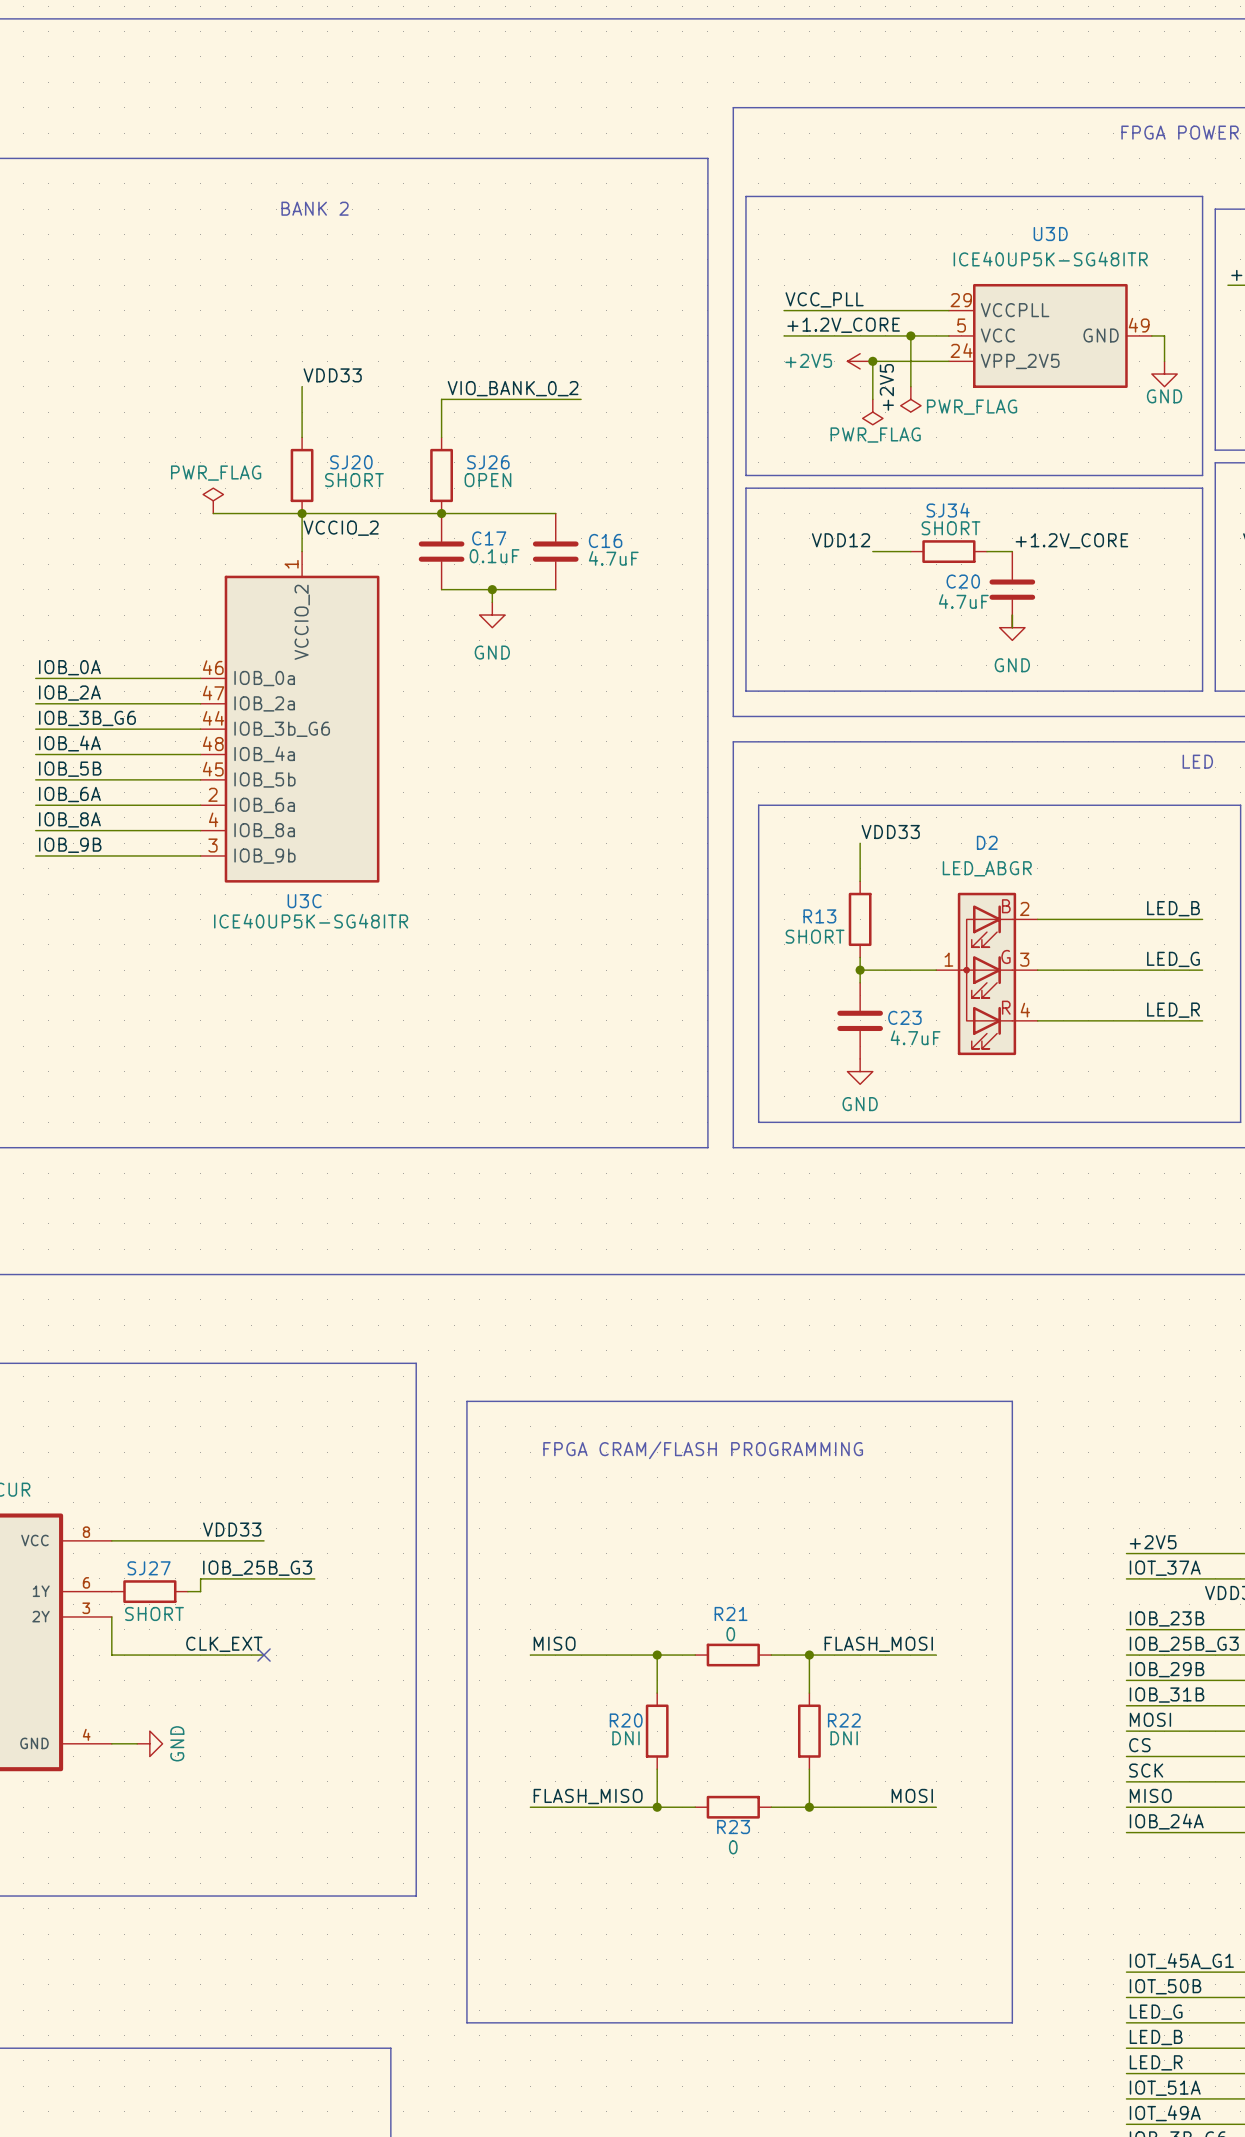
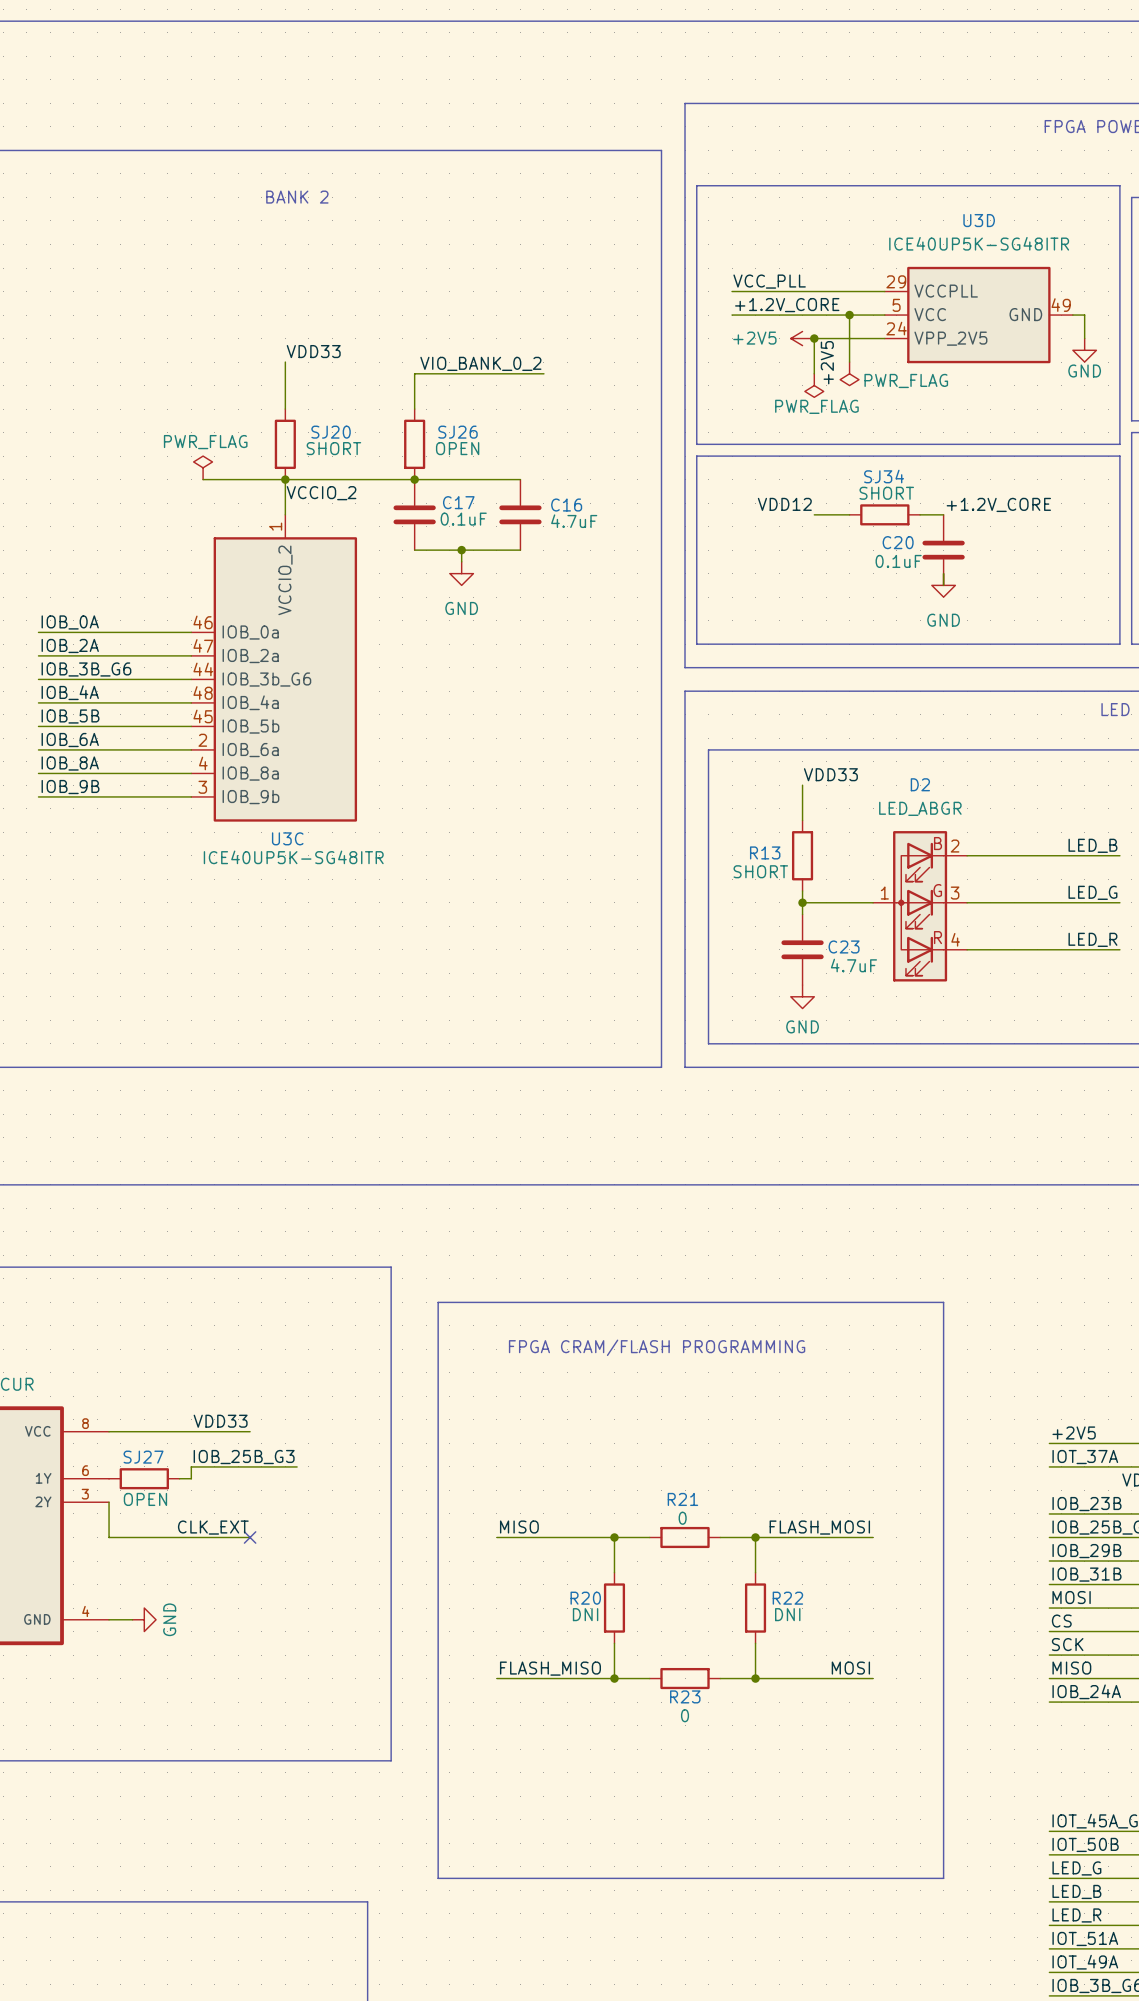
C20 value: 4.7uF (963, 601) -> 0.1uF (898, 561)
SJ27 value: SHORT (154, 1613) -> OPEN (145, 1499)

